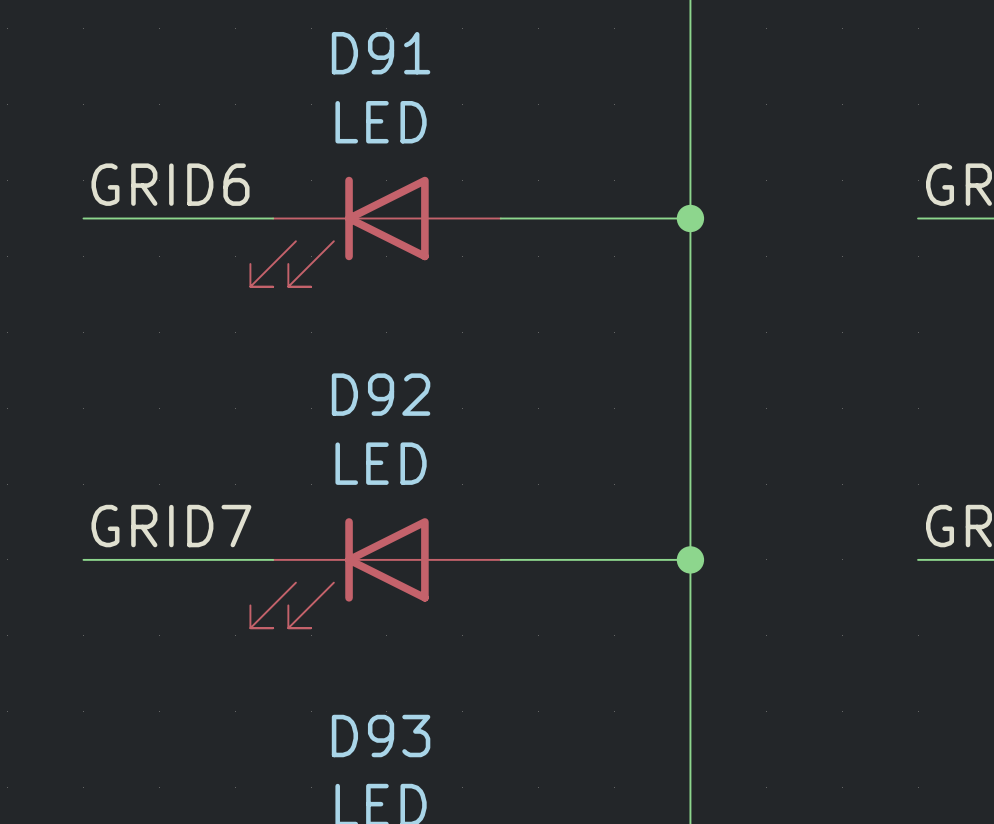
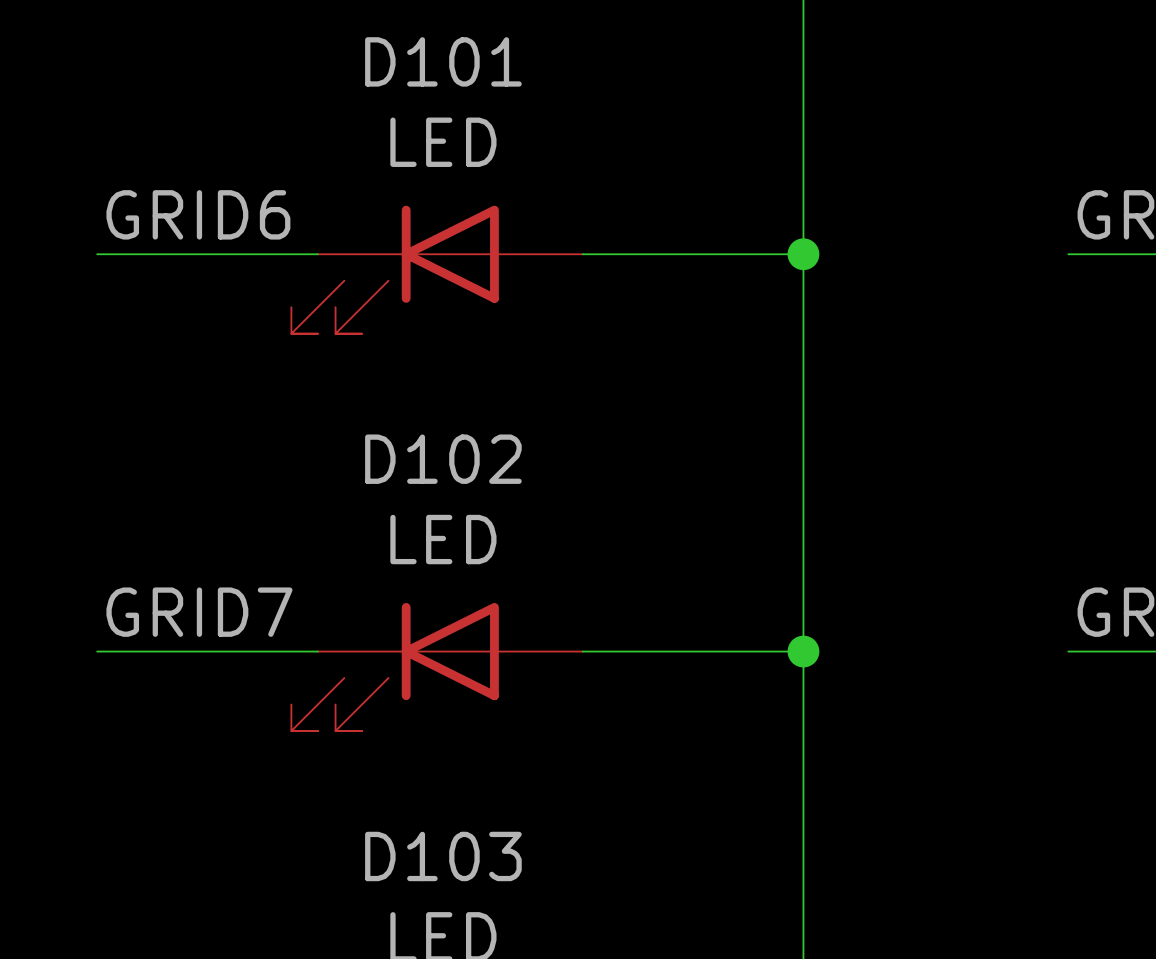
D91 name: D91 (381, 53) -> D101 (443, 61)
D92 name: D92 (381, 394) -> D102 (443, 459)
D93 name: D93 (381, 736) -> D103 (443, 856)

